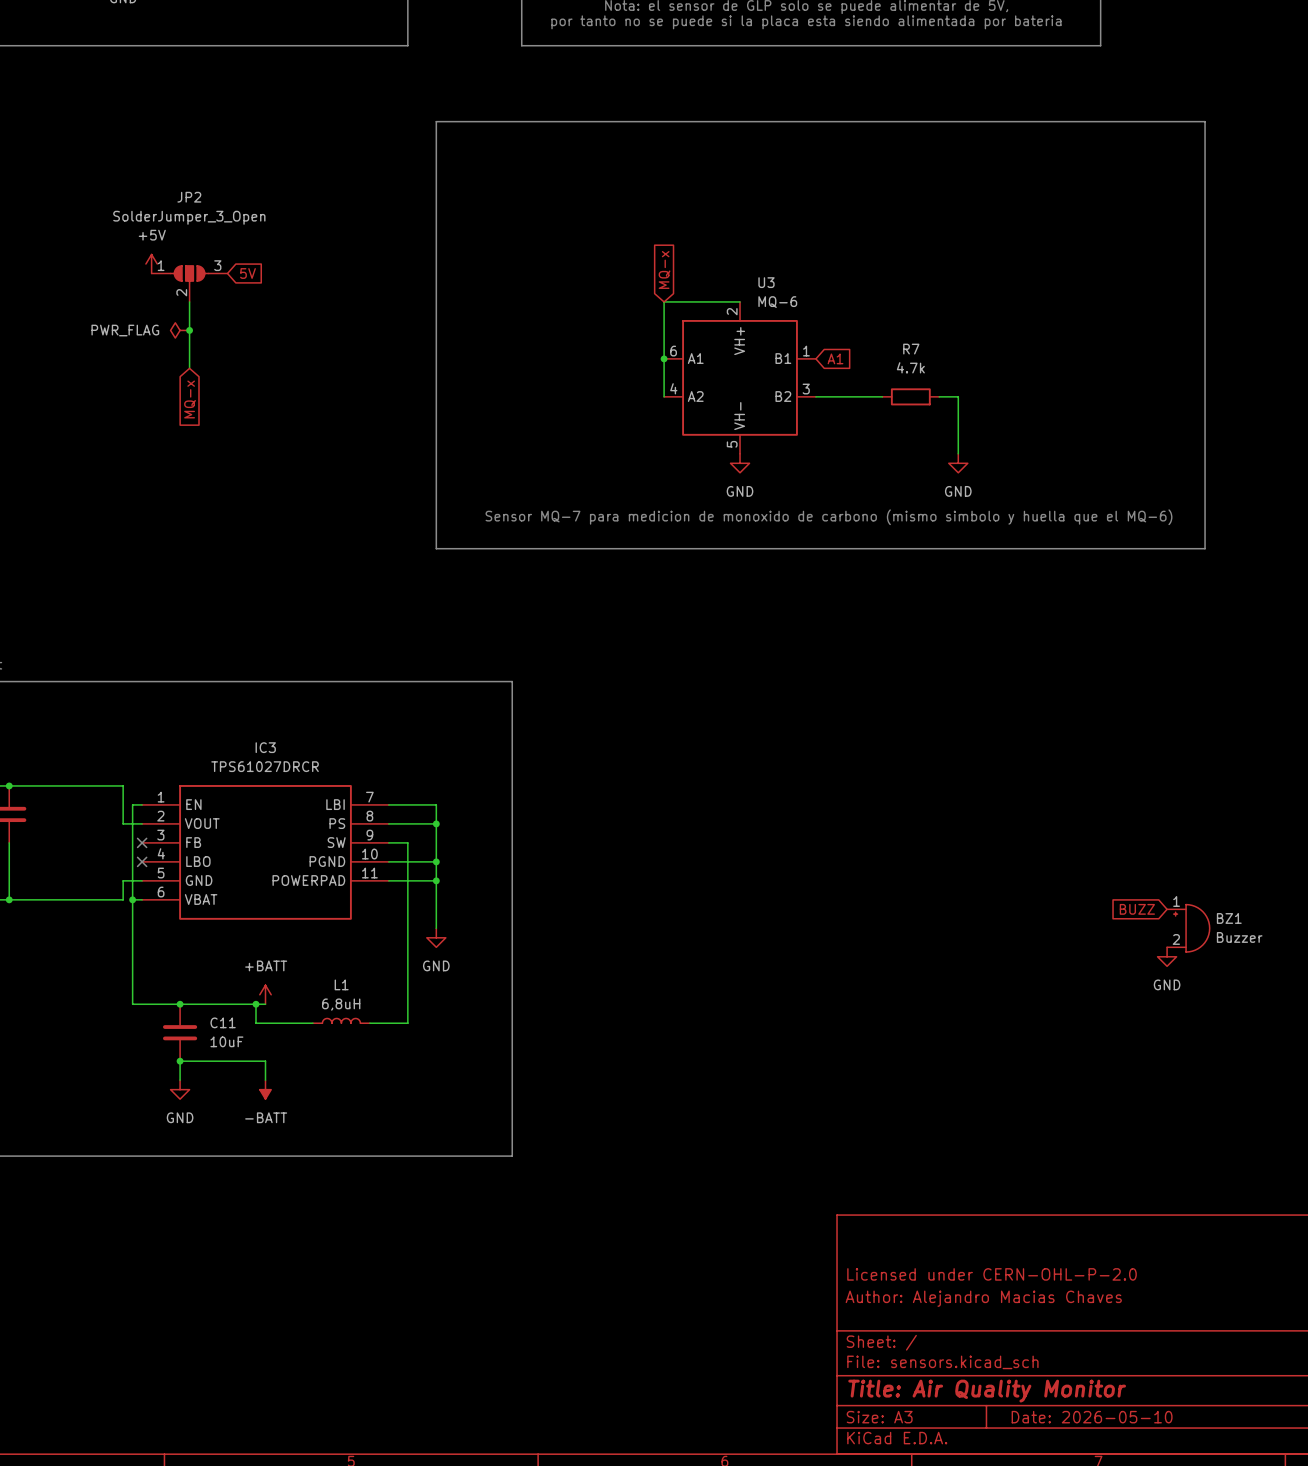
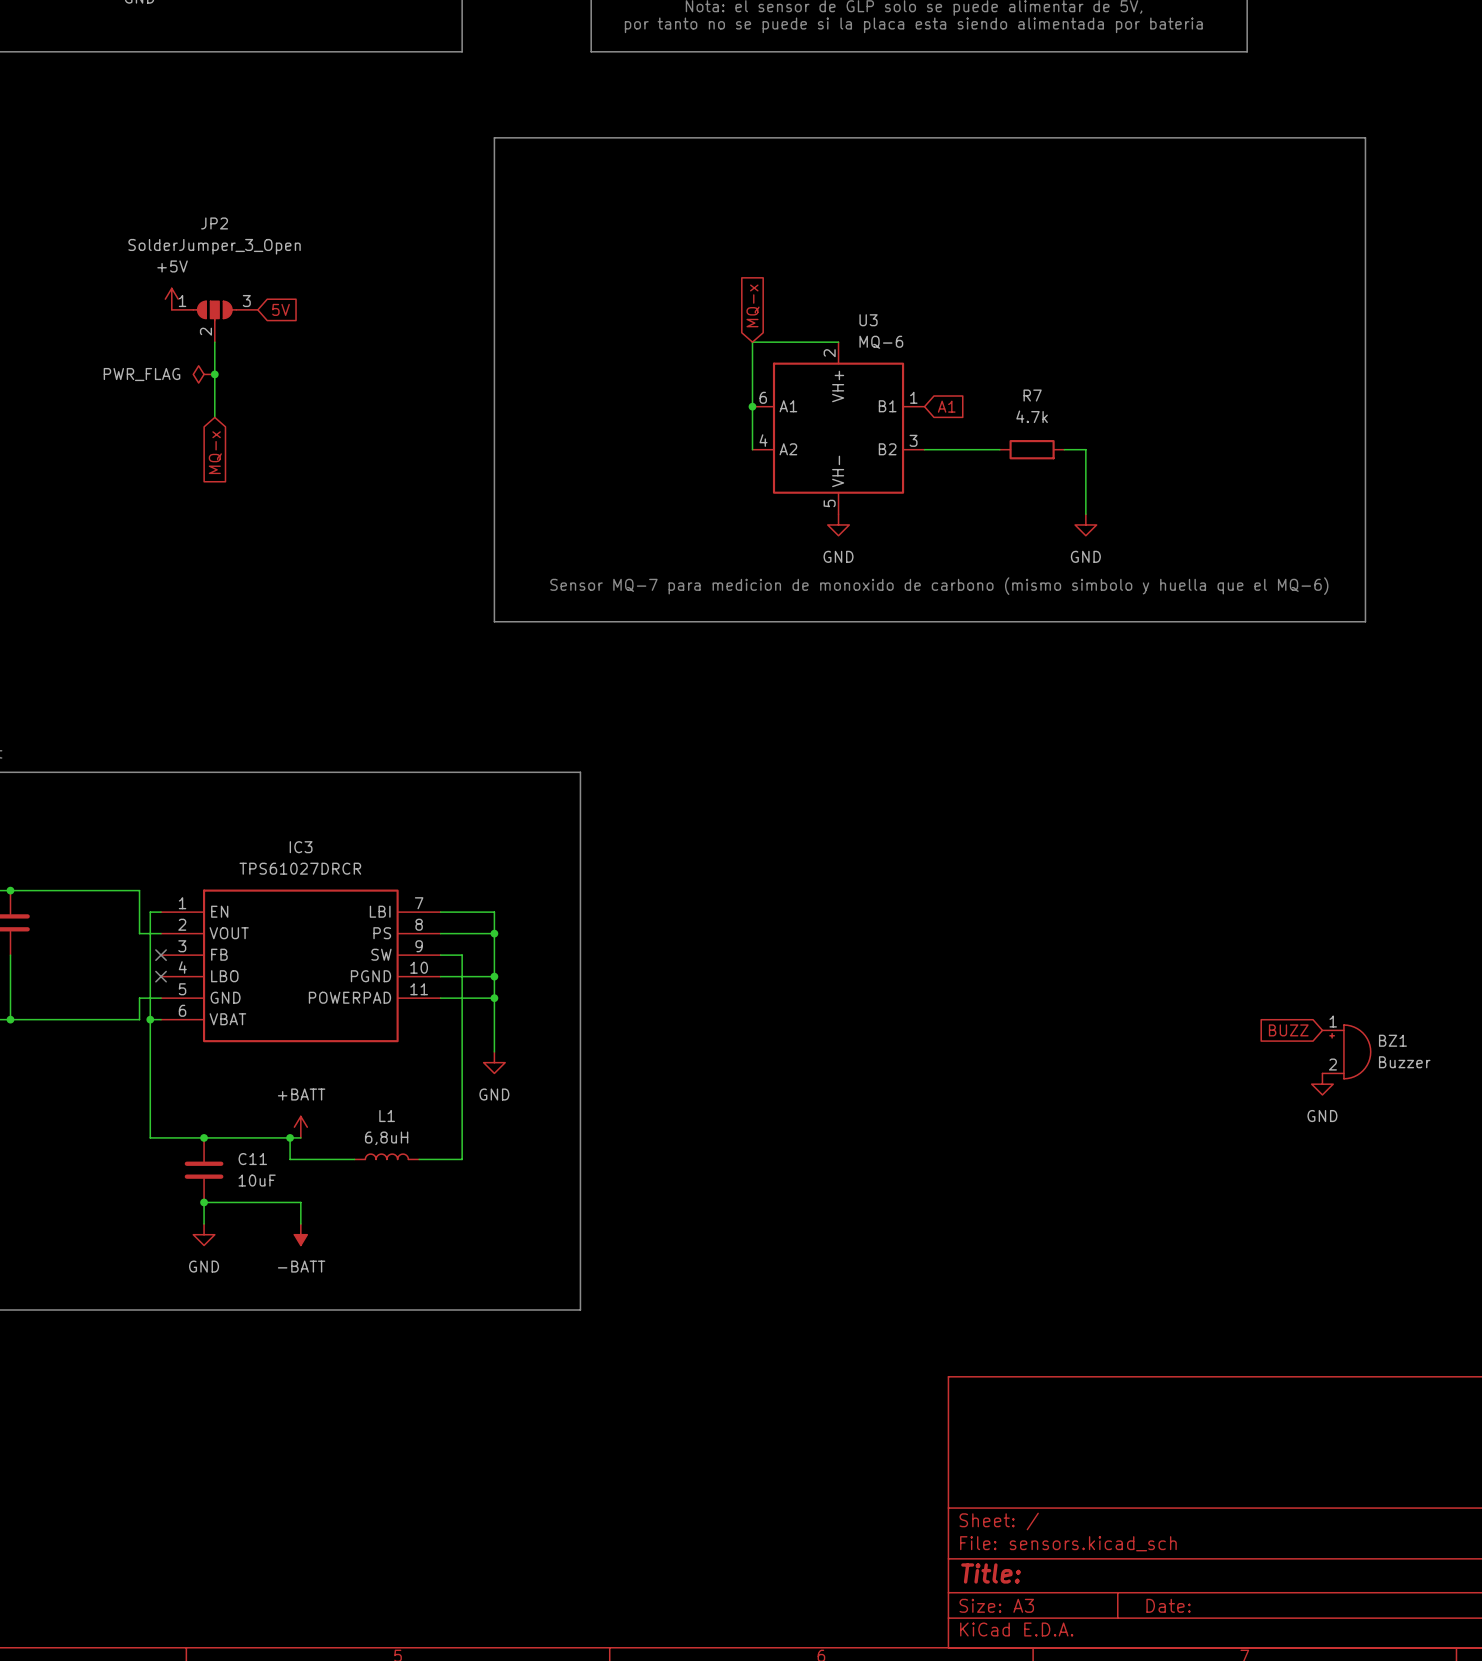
title block: Licensed under CERN-OHL-P-2.0 (992, 1274) -> none
title block: Author: Alejandro Macias Chaves (983, 1298) -> none
title block: Title: Air Quality Monitor (987, 1391) -> Title: (991, 1573)
title block: Date: 2026-05-10 (1092, 1417) -> Date: (1168, 1605)

